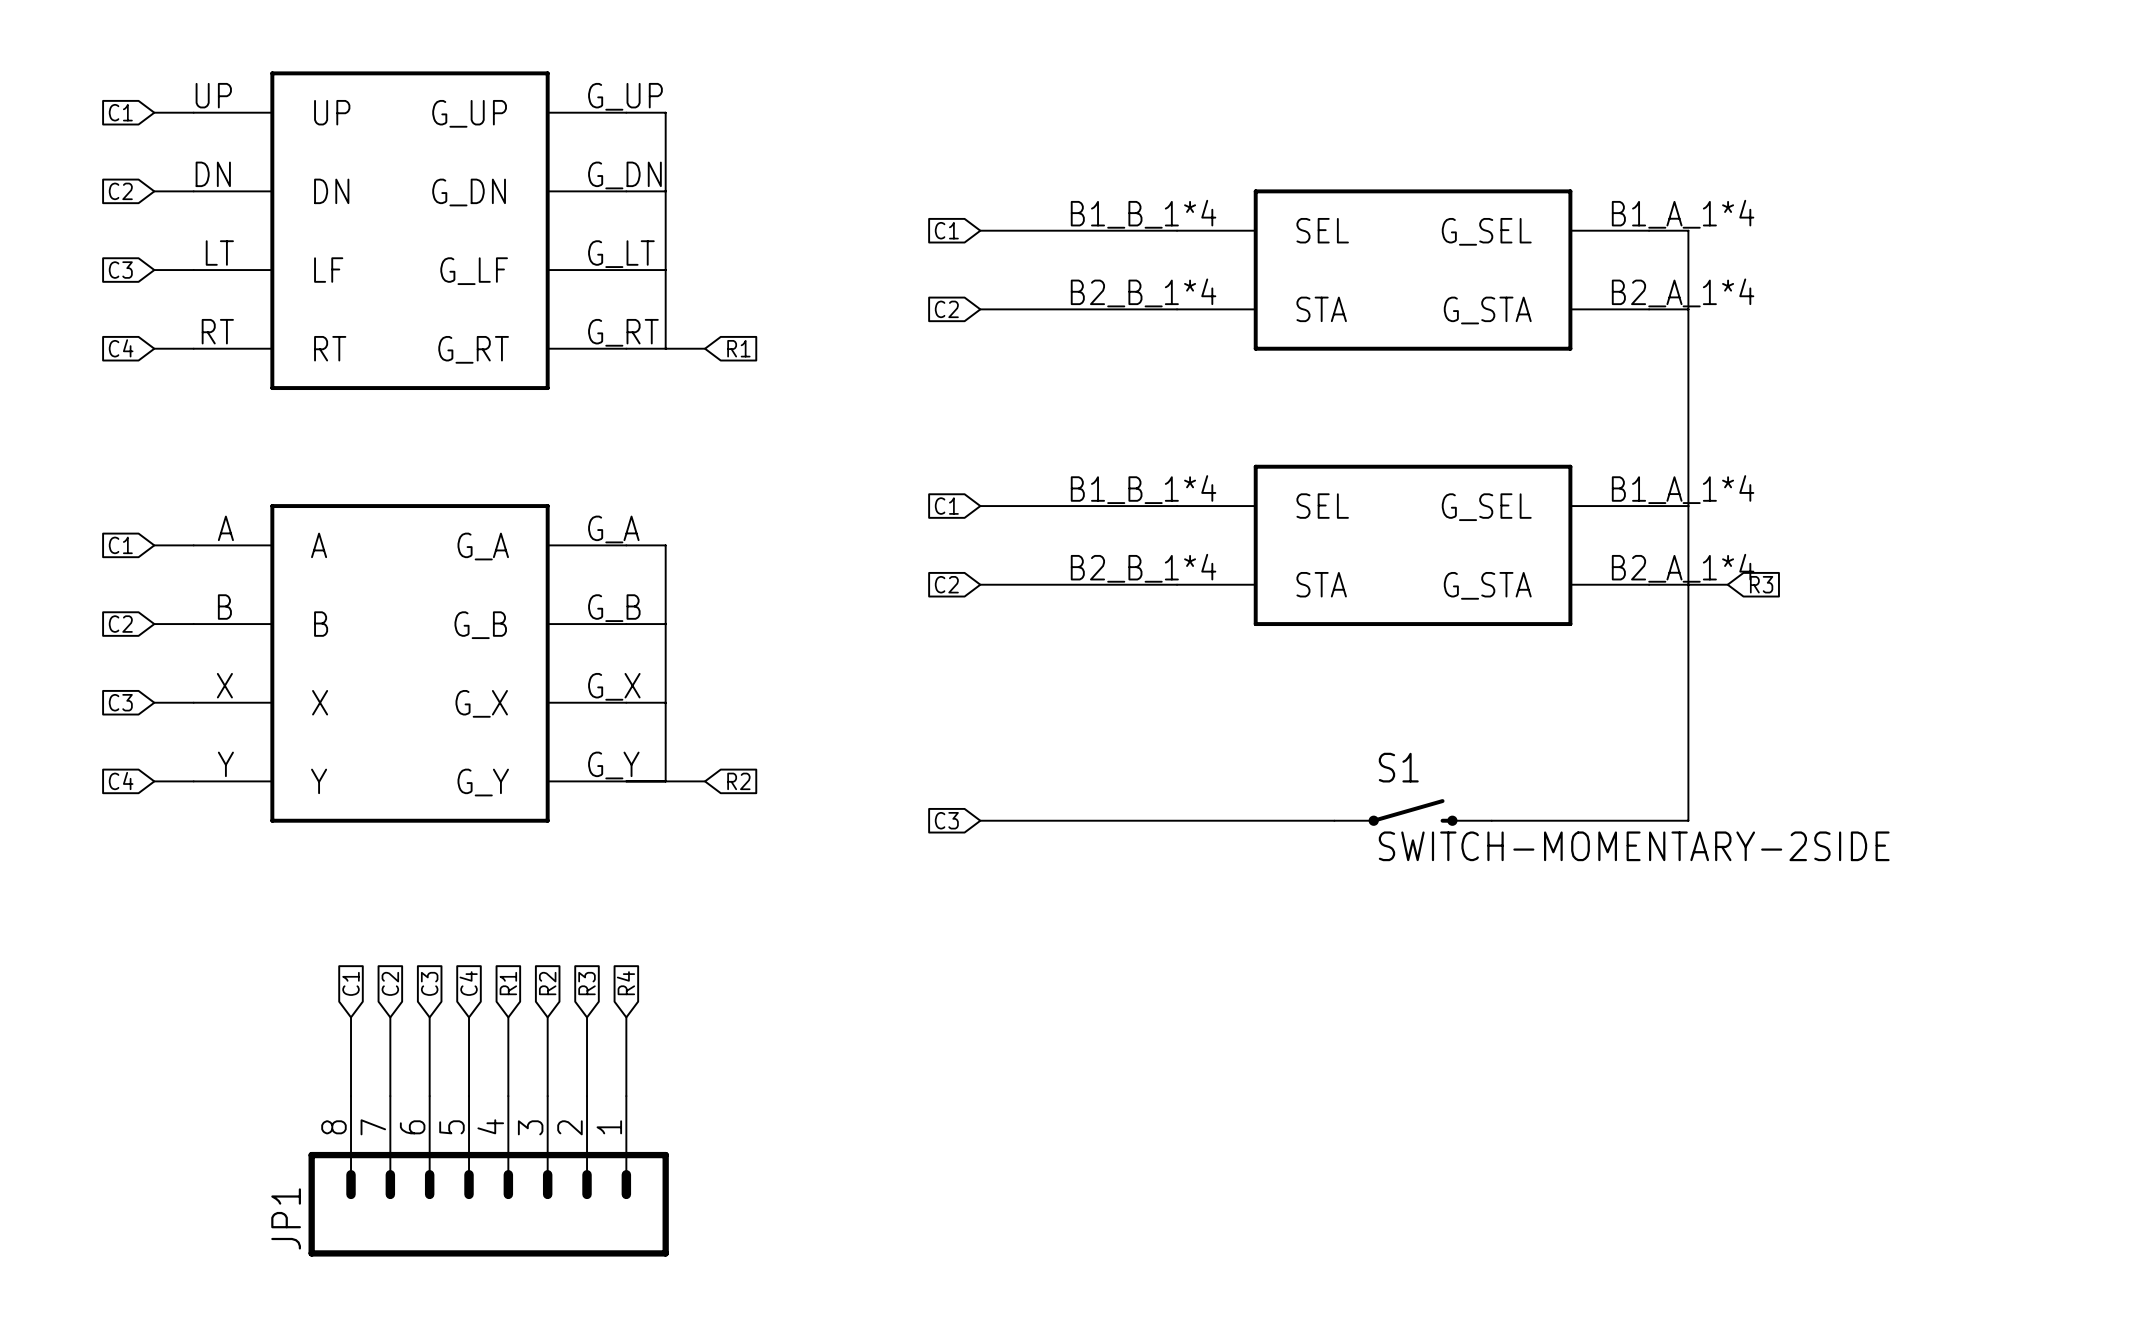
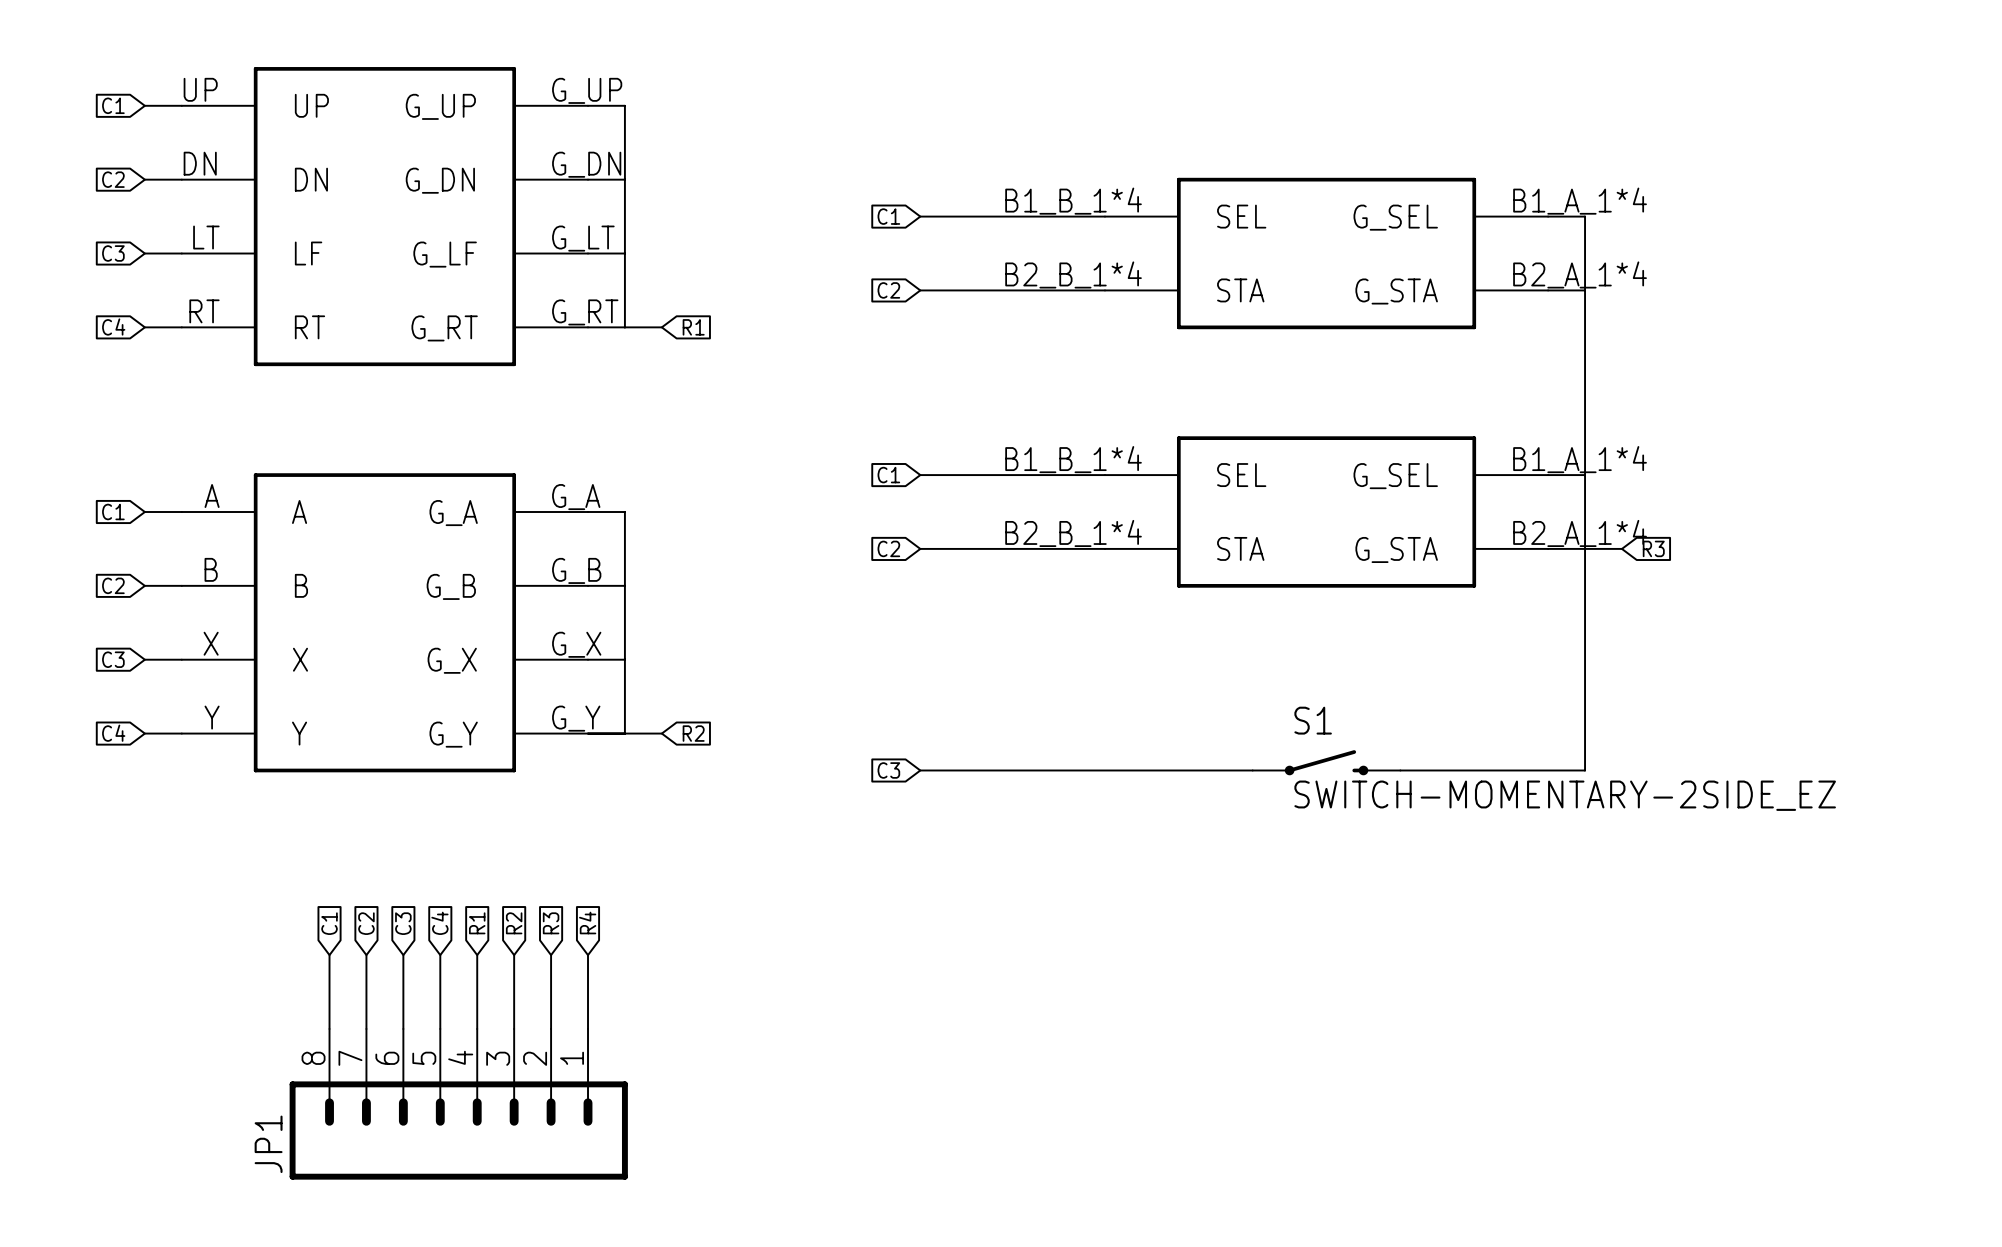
S1 value: SWITCH-MOMENTARY-2SIDE (1634, 846) -> SWITCH-MOMENTARY-2SIDE_EZ (1565, 795)

